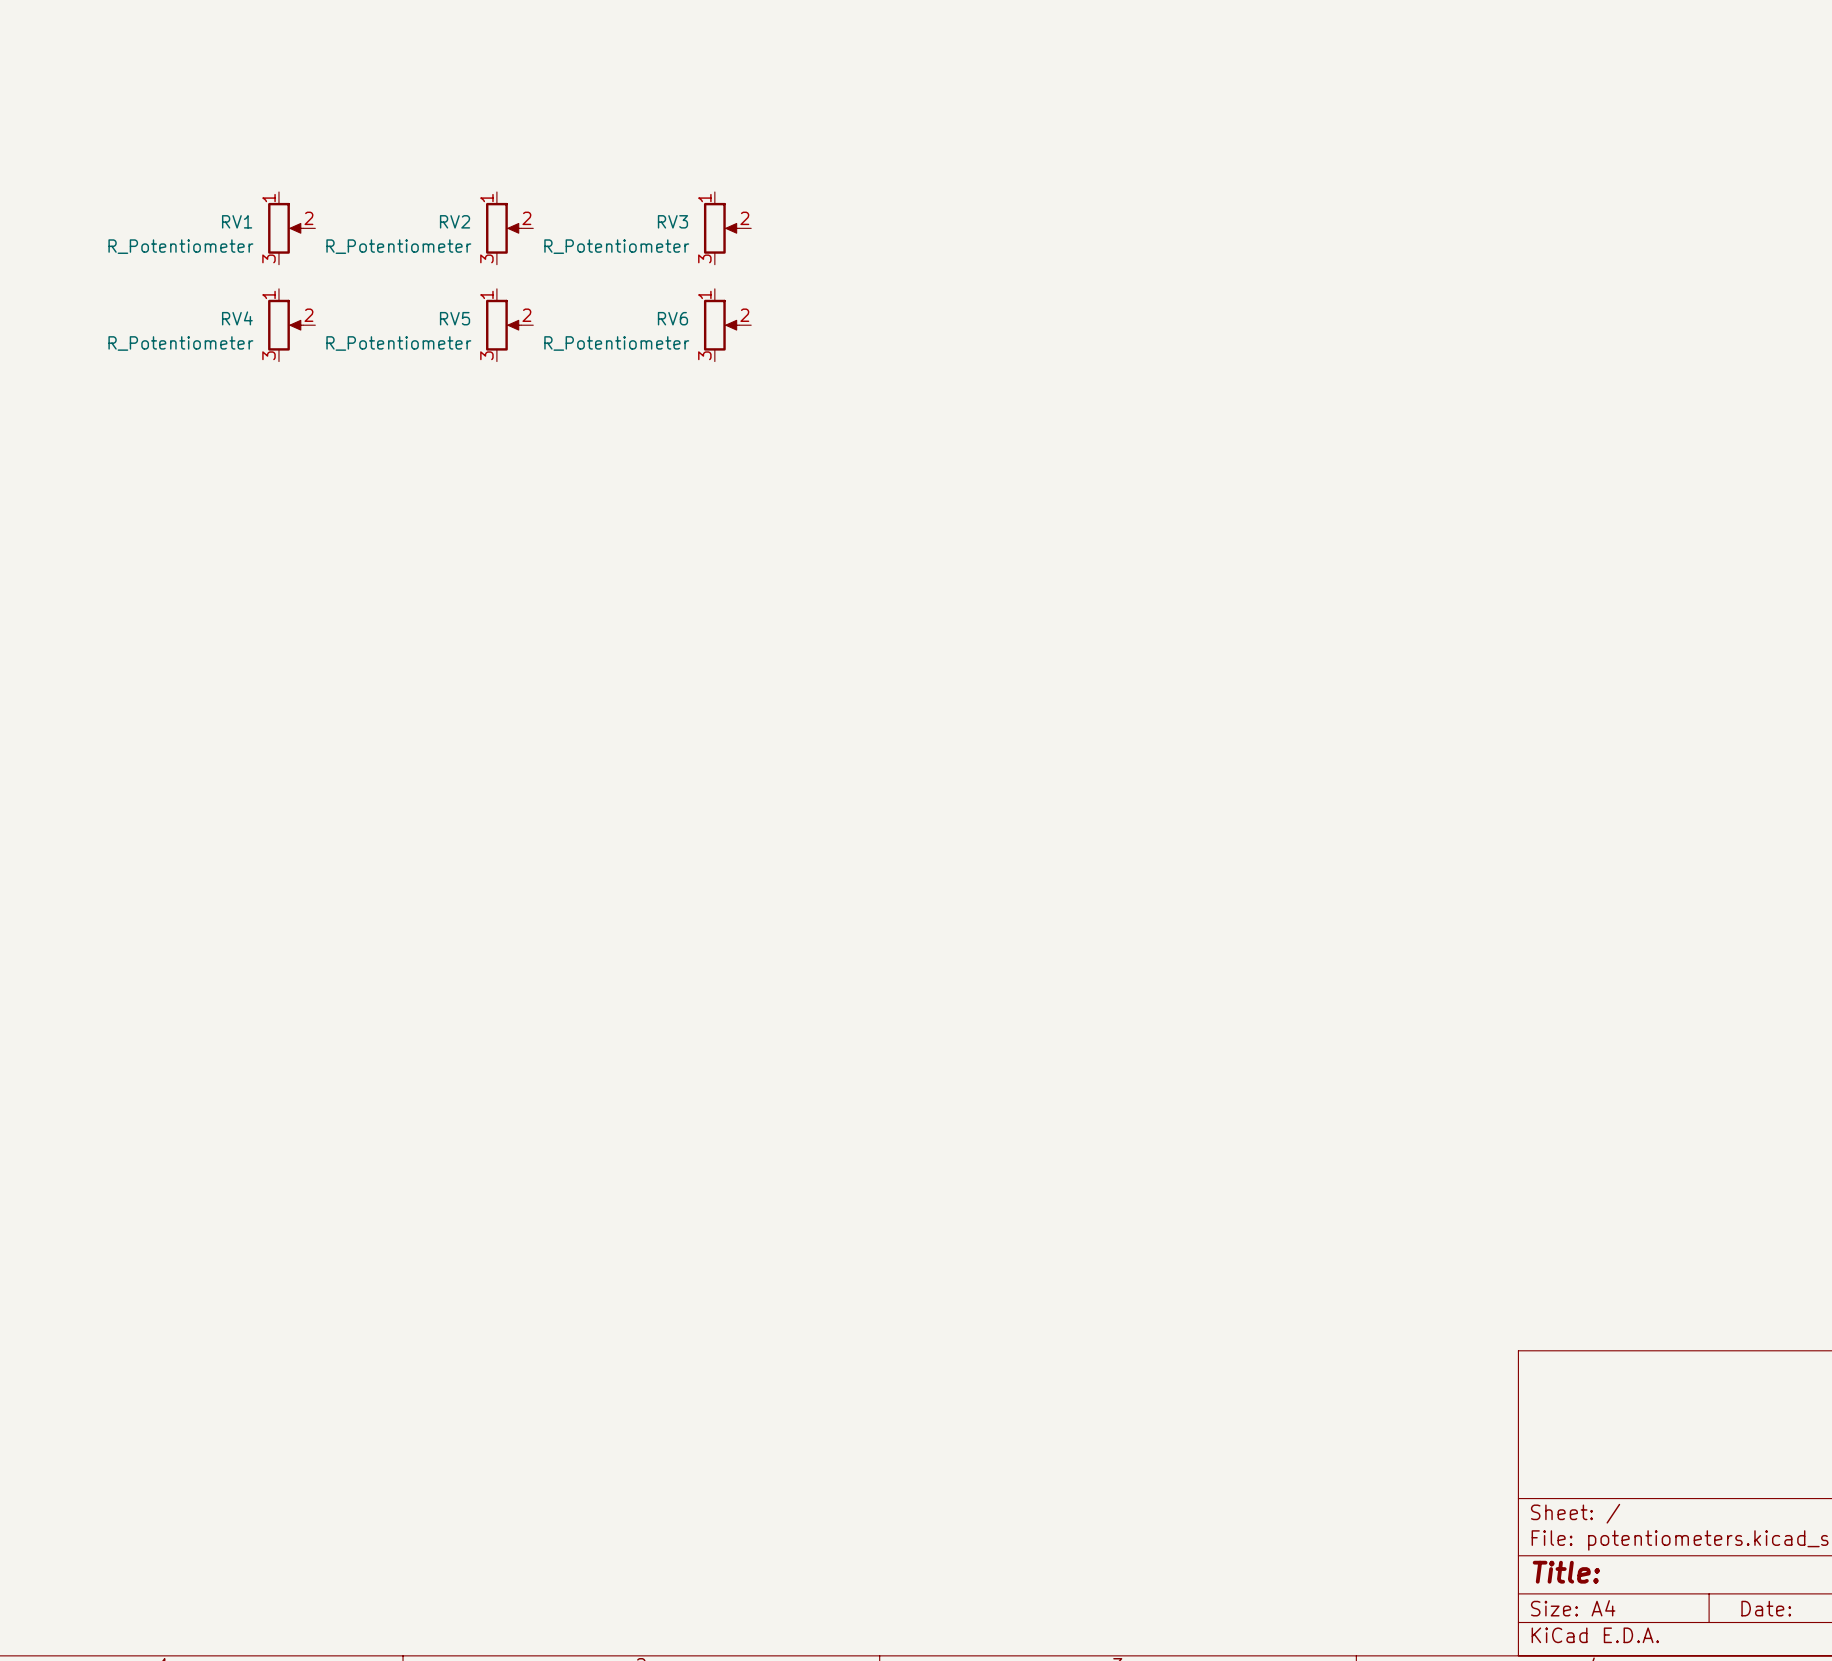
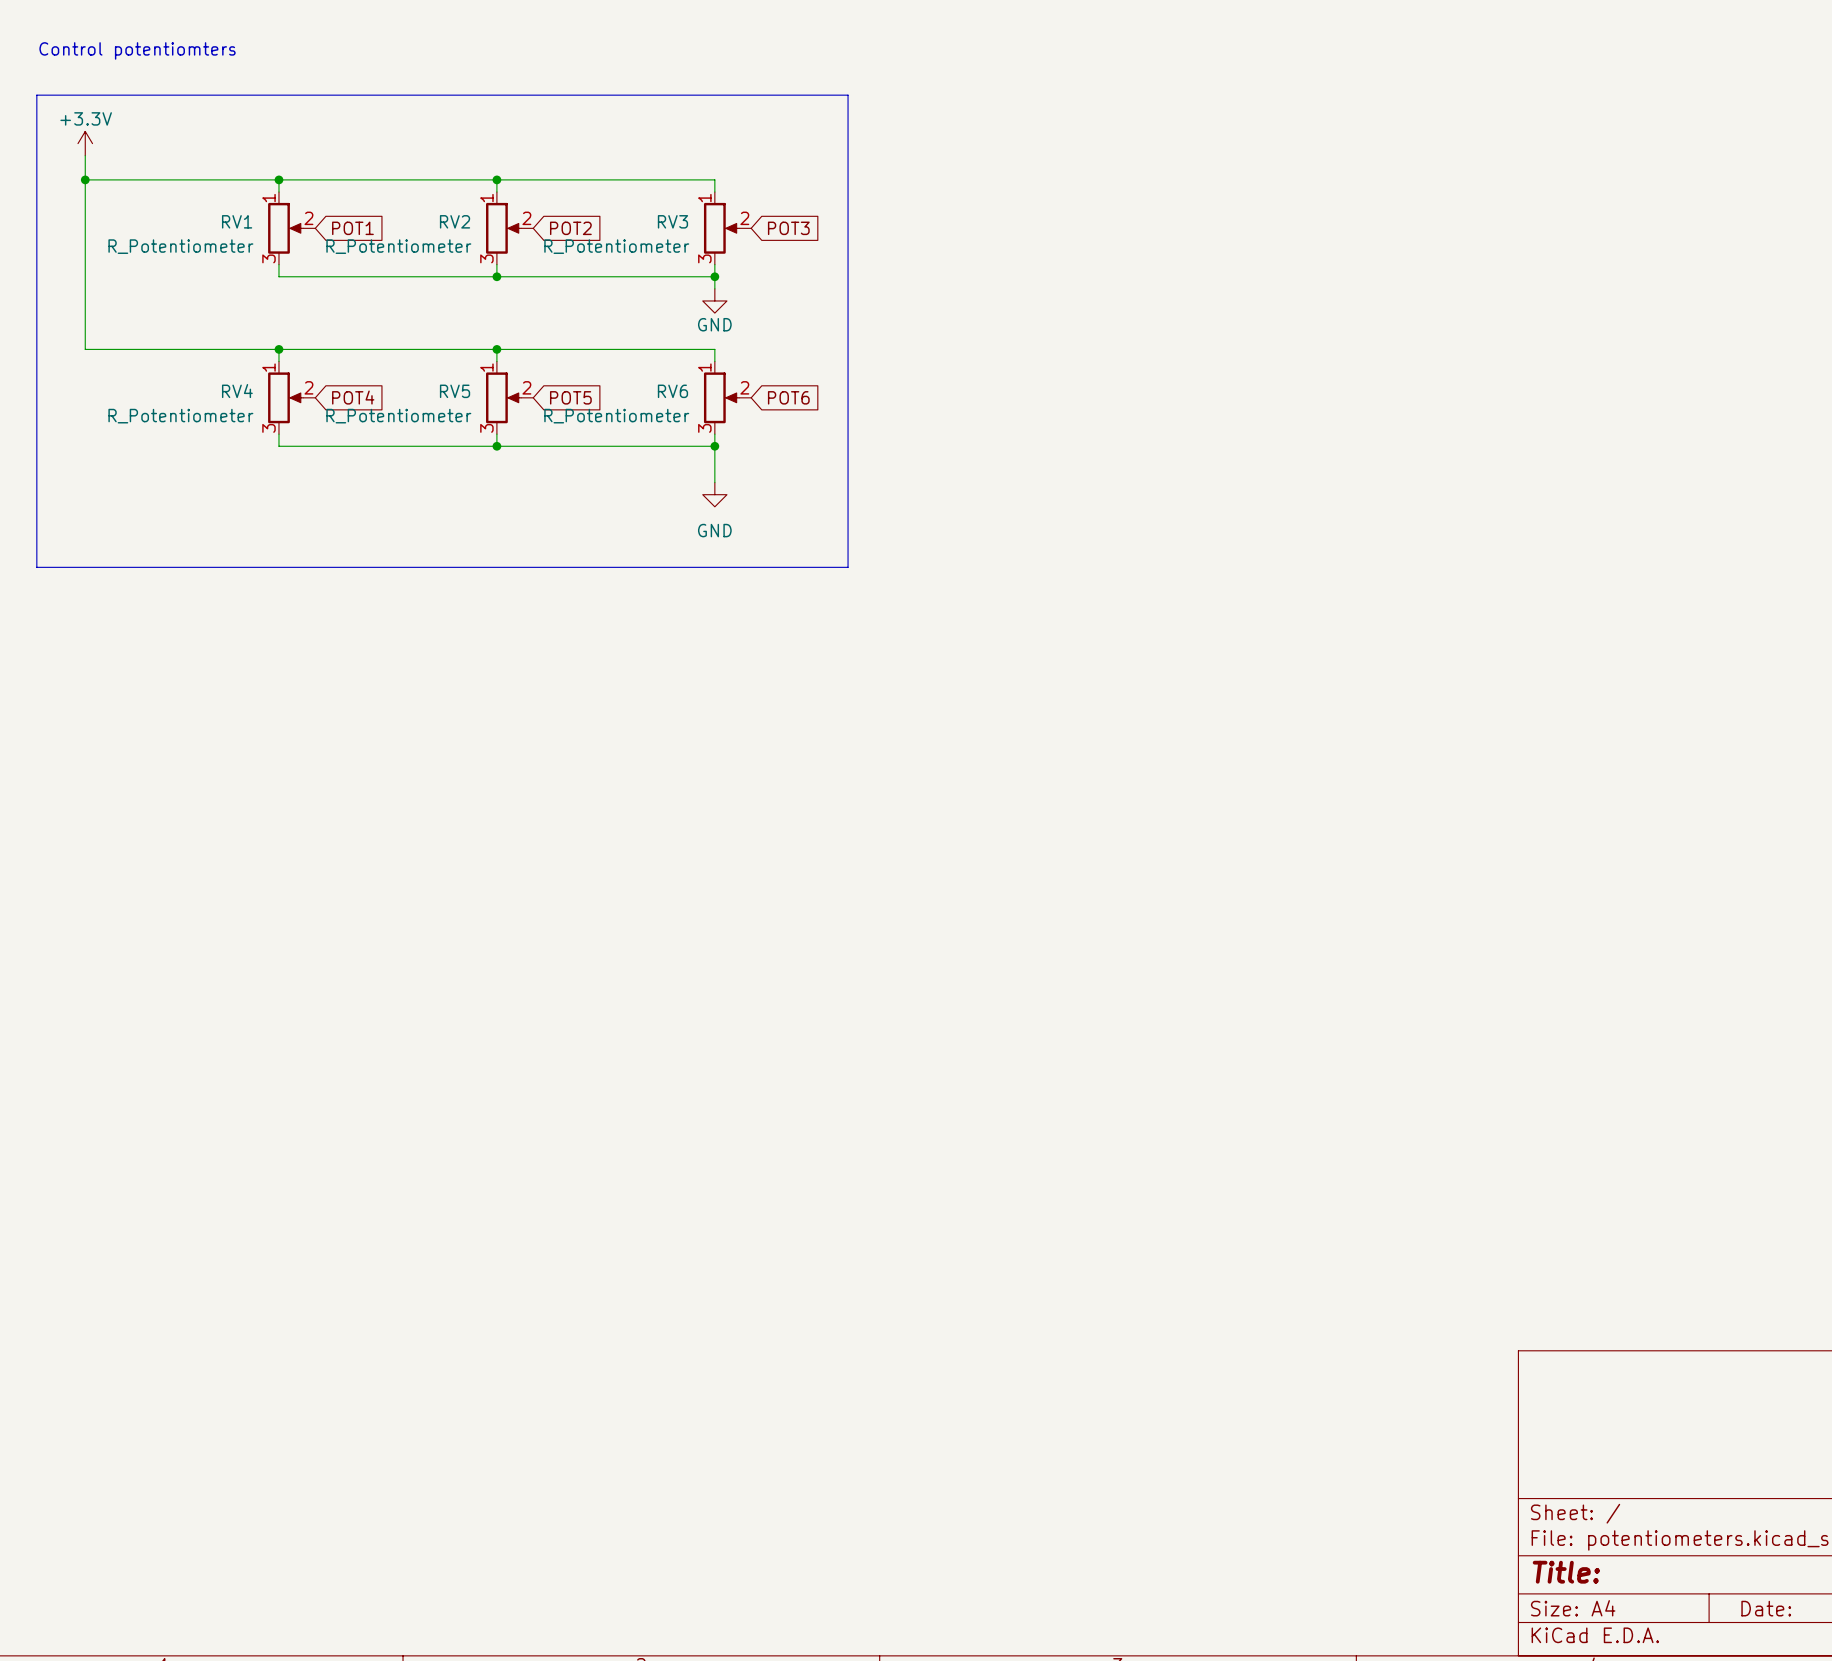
text: none -> Control potentiomters (137, 50)
line: none -> (36, 95) (848, 95) (848, 567) (36, 567) (36, 95)
power symbol: none -> +3.3V (85, 143)
wire: none -> (85, 155) (85, 349) (714, 349) (714, 361)
wire: none -> (85, 179) (714, 179) (714, 192)
junction: none -> (85, 179)
wire: none -> (278, 179) (278, 192)
junction: none -> (278, 179)
wire: none -> (496, 179) (496, 192)
junction: none -> (496, 179)
global label: none -> POT1 (352, 228)
global label: none -> POT2 (570, 228)
global label: none -> POT3 (788, 228)
wire: none -> (278, 264) (278, 276) (714, 276)
wire: none -> (496, 264) (496, 276)
wire: none -> (714, 264) (714, 288)
junction: none -> (496, 276)
junction: none -> (714, 276)
power symbol: none -> GND (714, 300)
RV4 position: (291, 325) -> (291, 397)
RV5 position: (509, 325) -> (509, 397)
RV6 position: (727, 325) -> (727, 397)
junction: none -> (278, 349)
junction: none -> (496, 349)
global label: none -> POT4 (353, 397)
global label: none -> POT5 (570, 397)
global label: none -> POT6 (788, 397)
wire: none -> (278, 434) (278, 446) (714, 446)
wire: none -> (496, 434) (496, 446)
wire: none -> (714, 434) (714, 482)
junction: none -> (496, 446)
junction: none -> (714, 446)
power symbol: none -> GND (714, 494)

